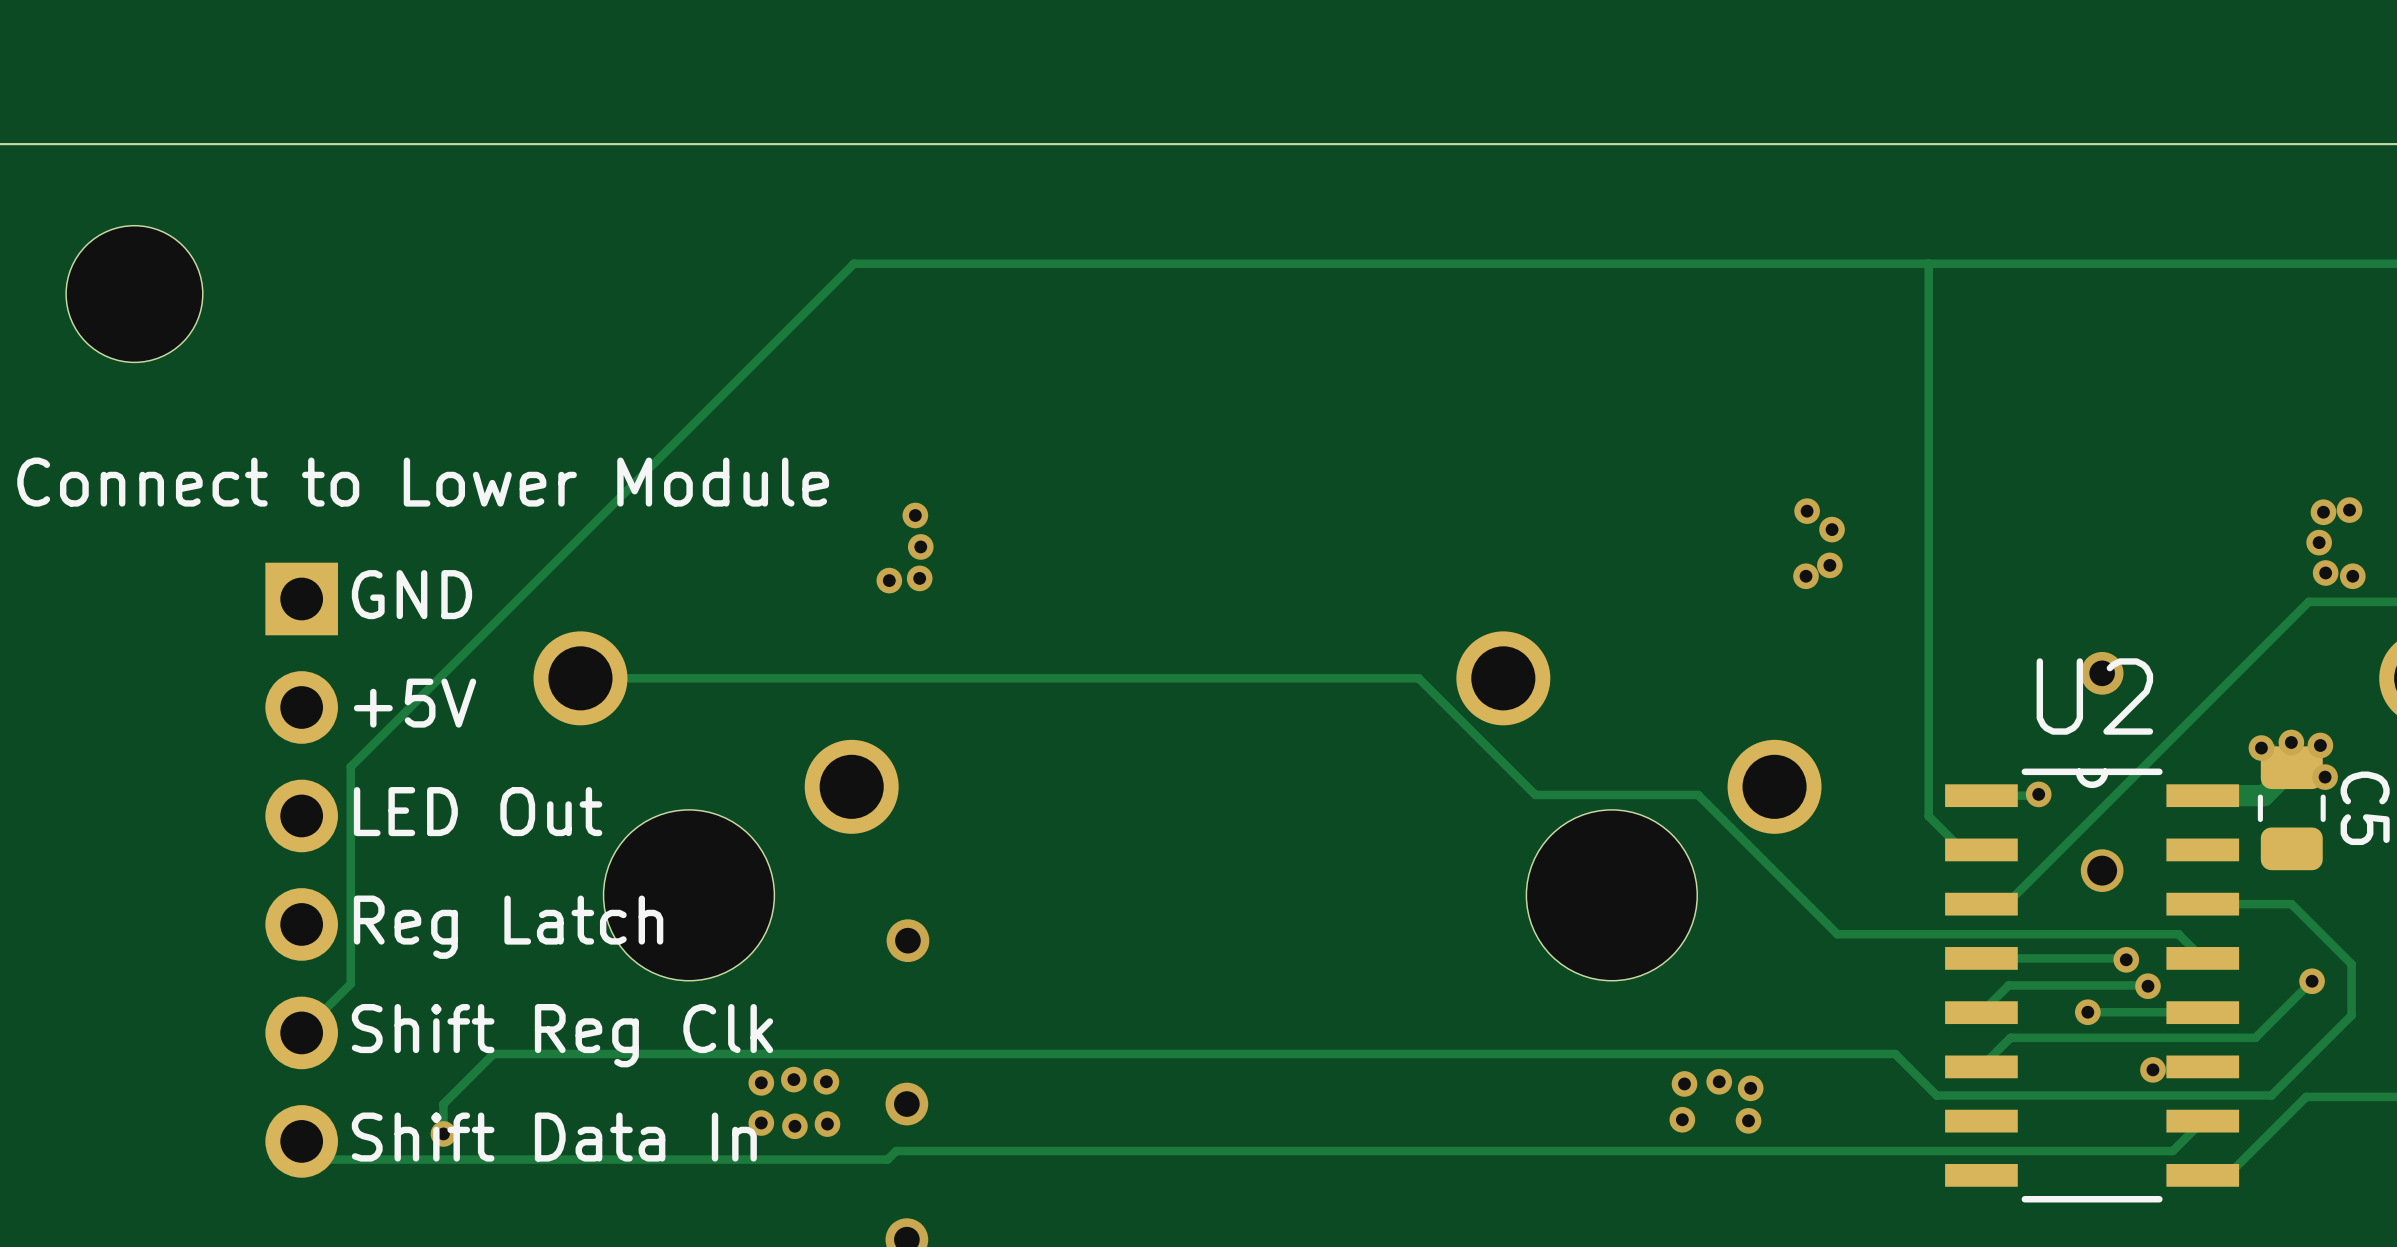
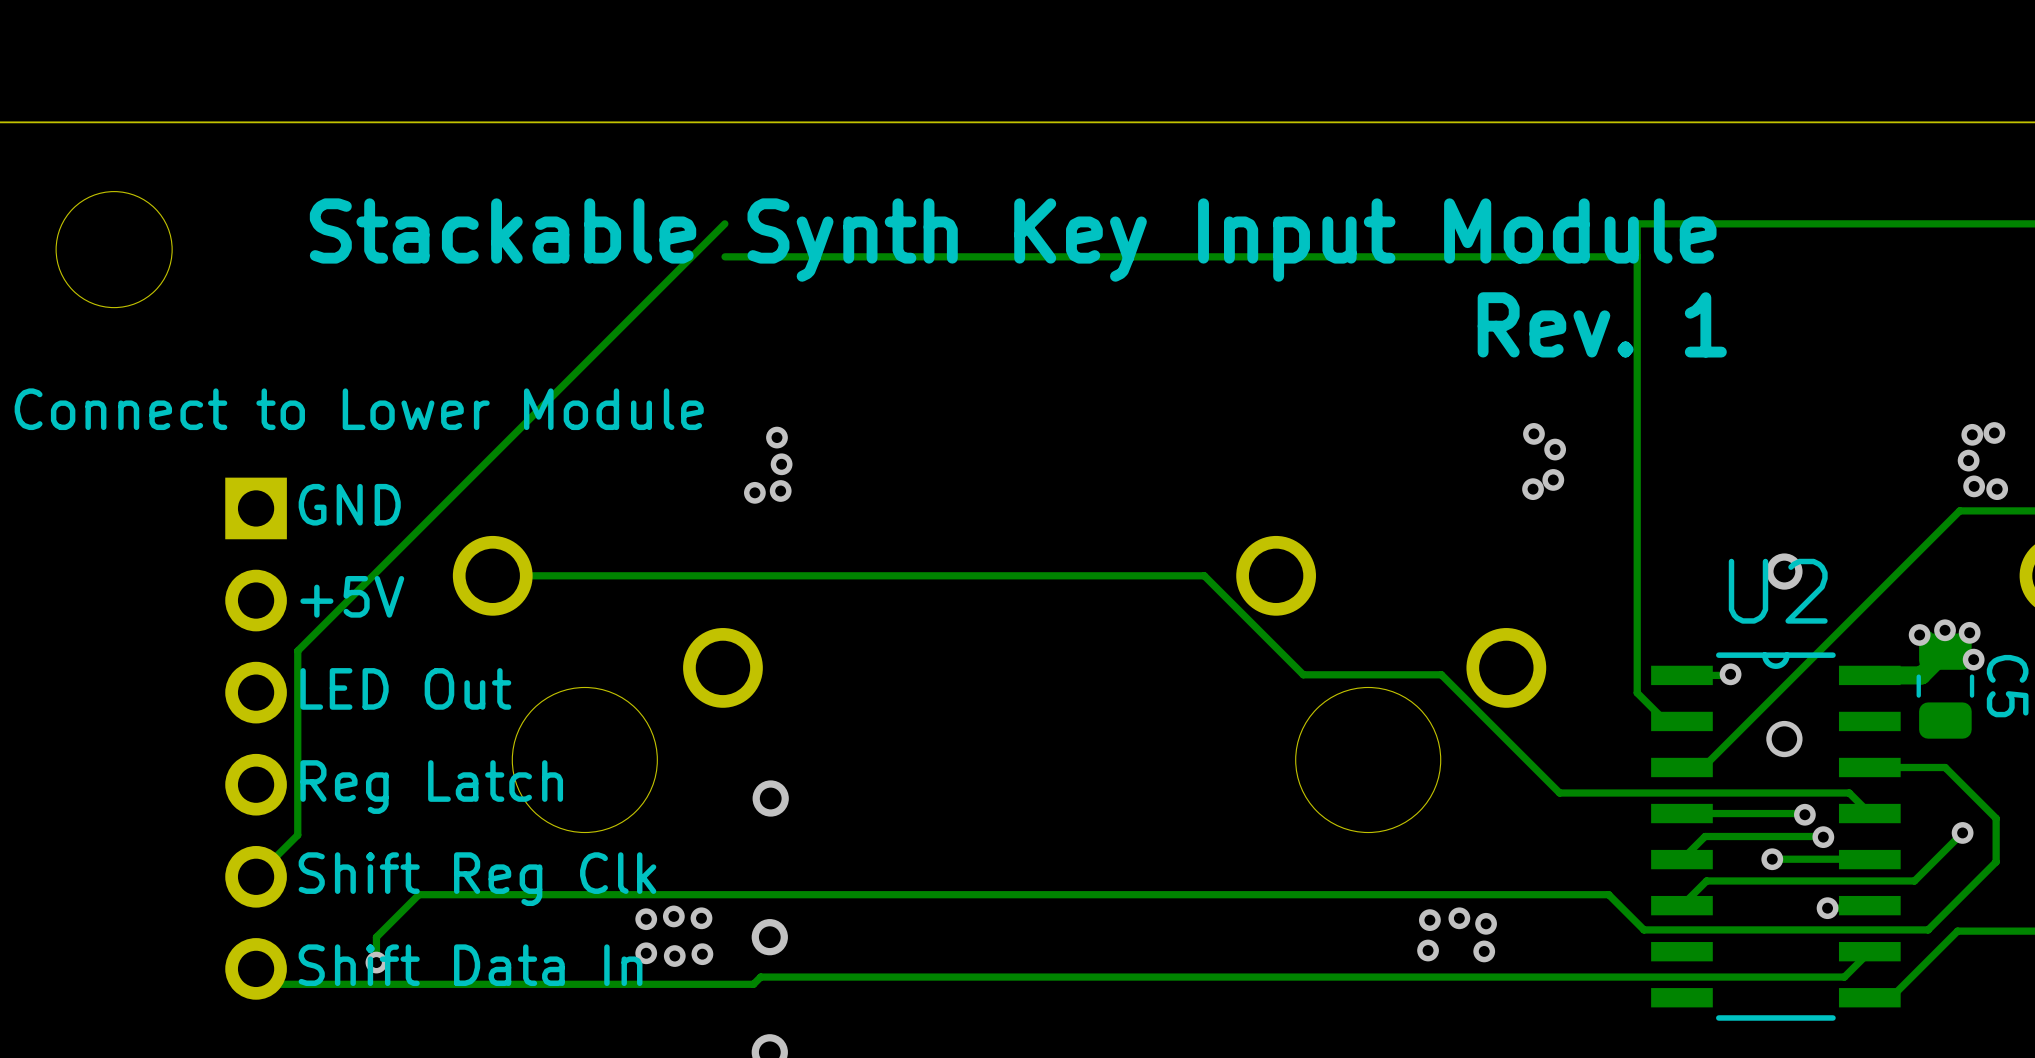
track: (1928, 263) (853, 263) -> (1637, 256) (725, 256)
text: none -> Stackable Synth Key Input Module (1013, 240)
text: none -> Rev. 1 (1602, 324)

